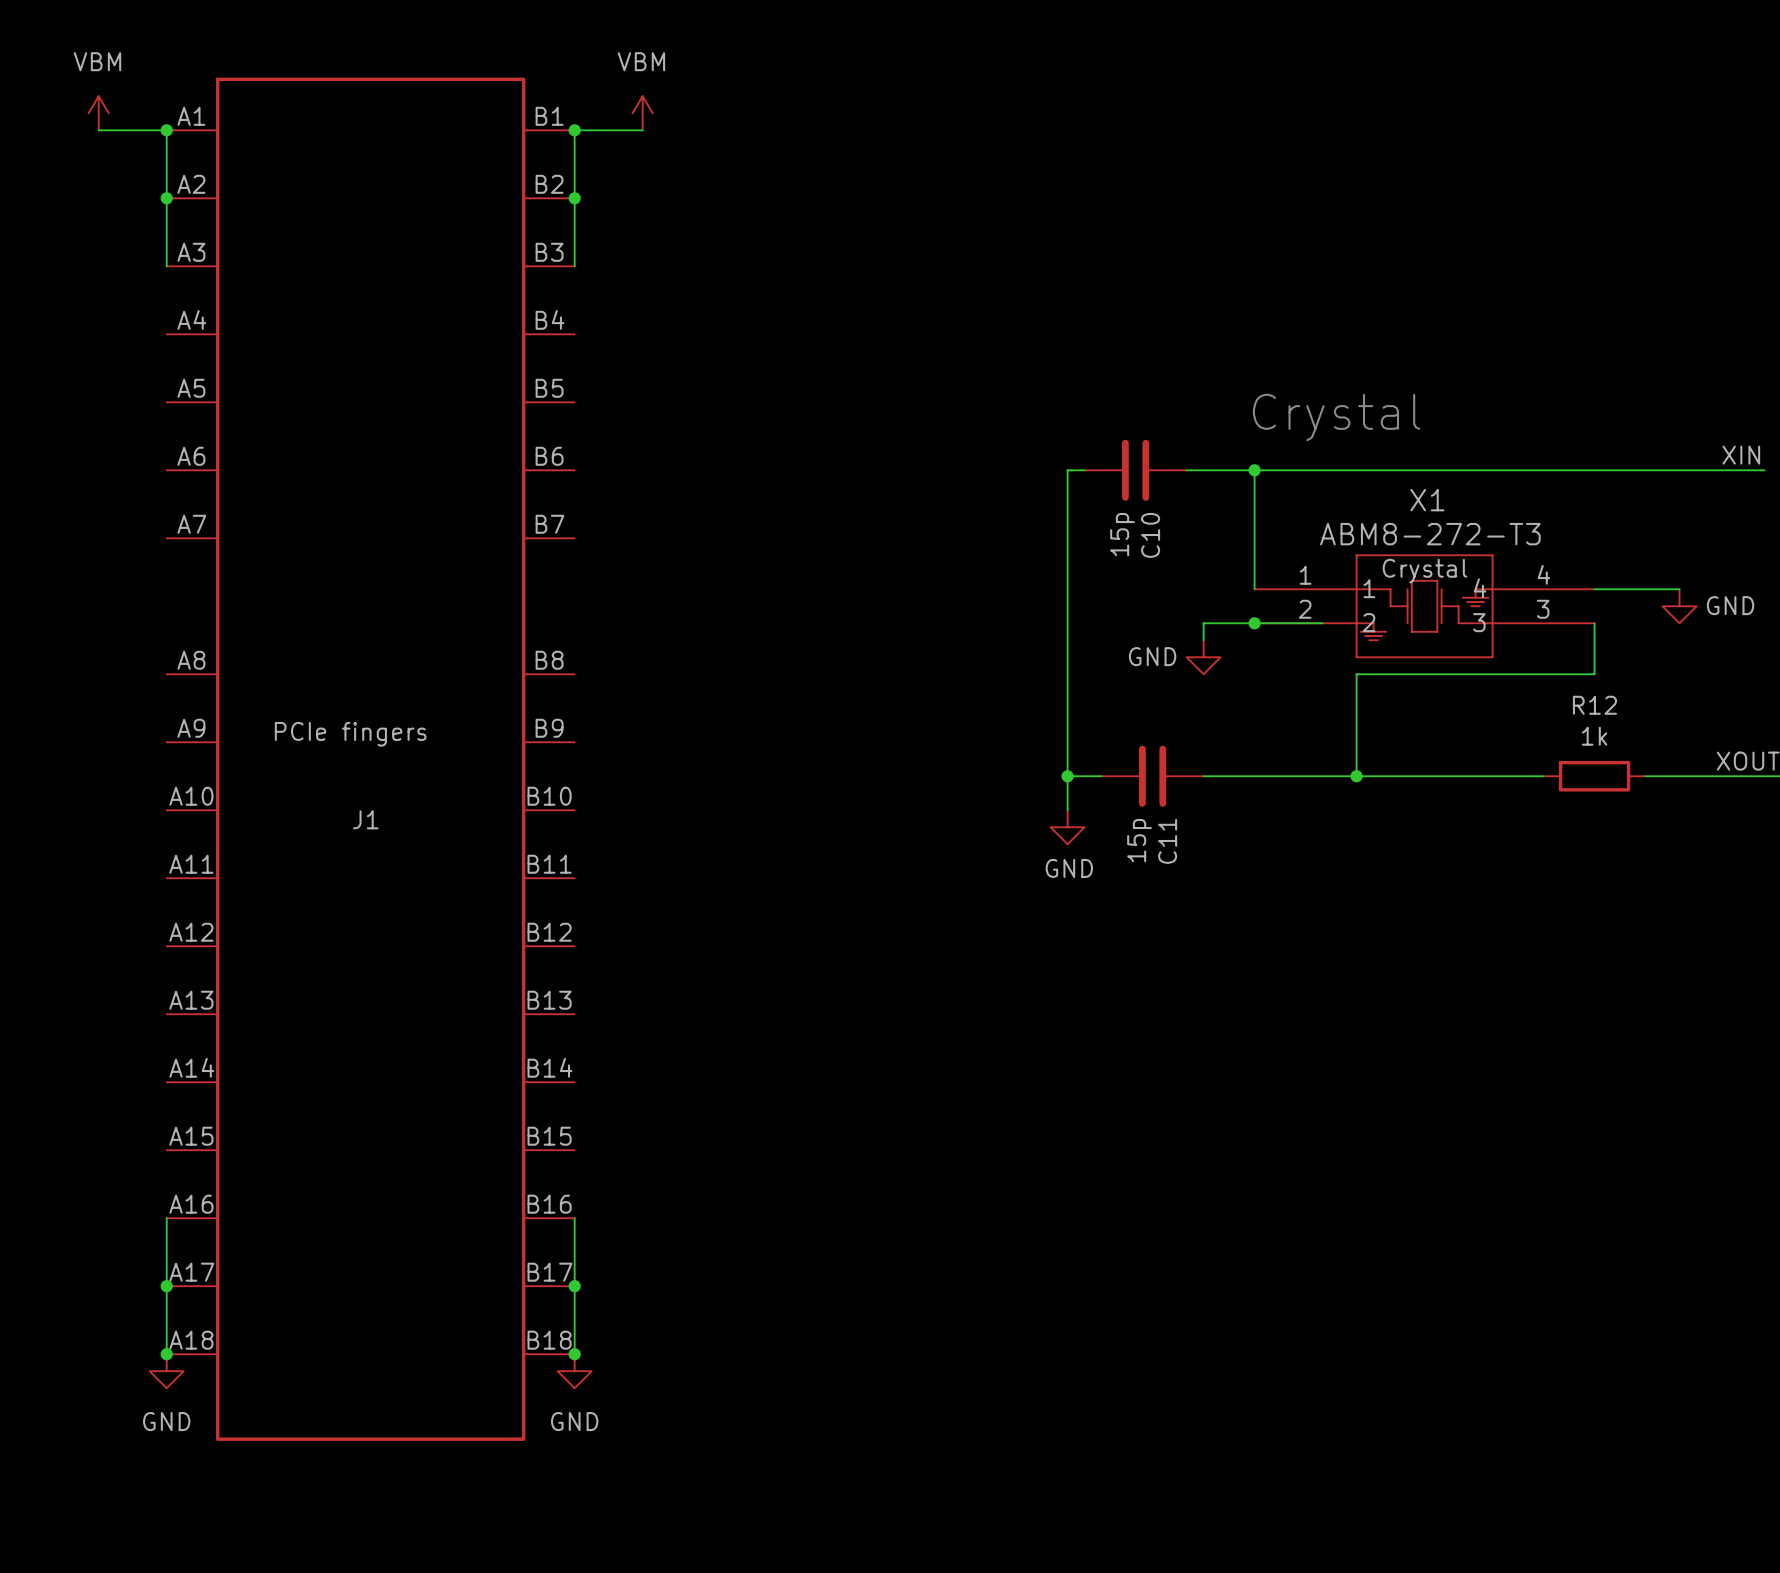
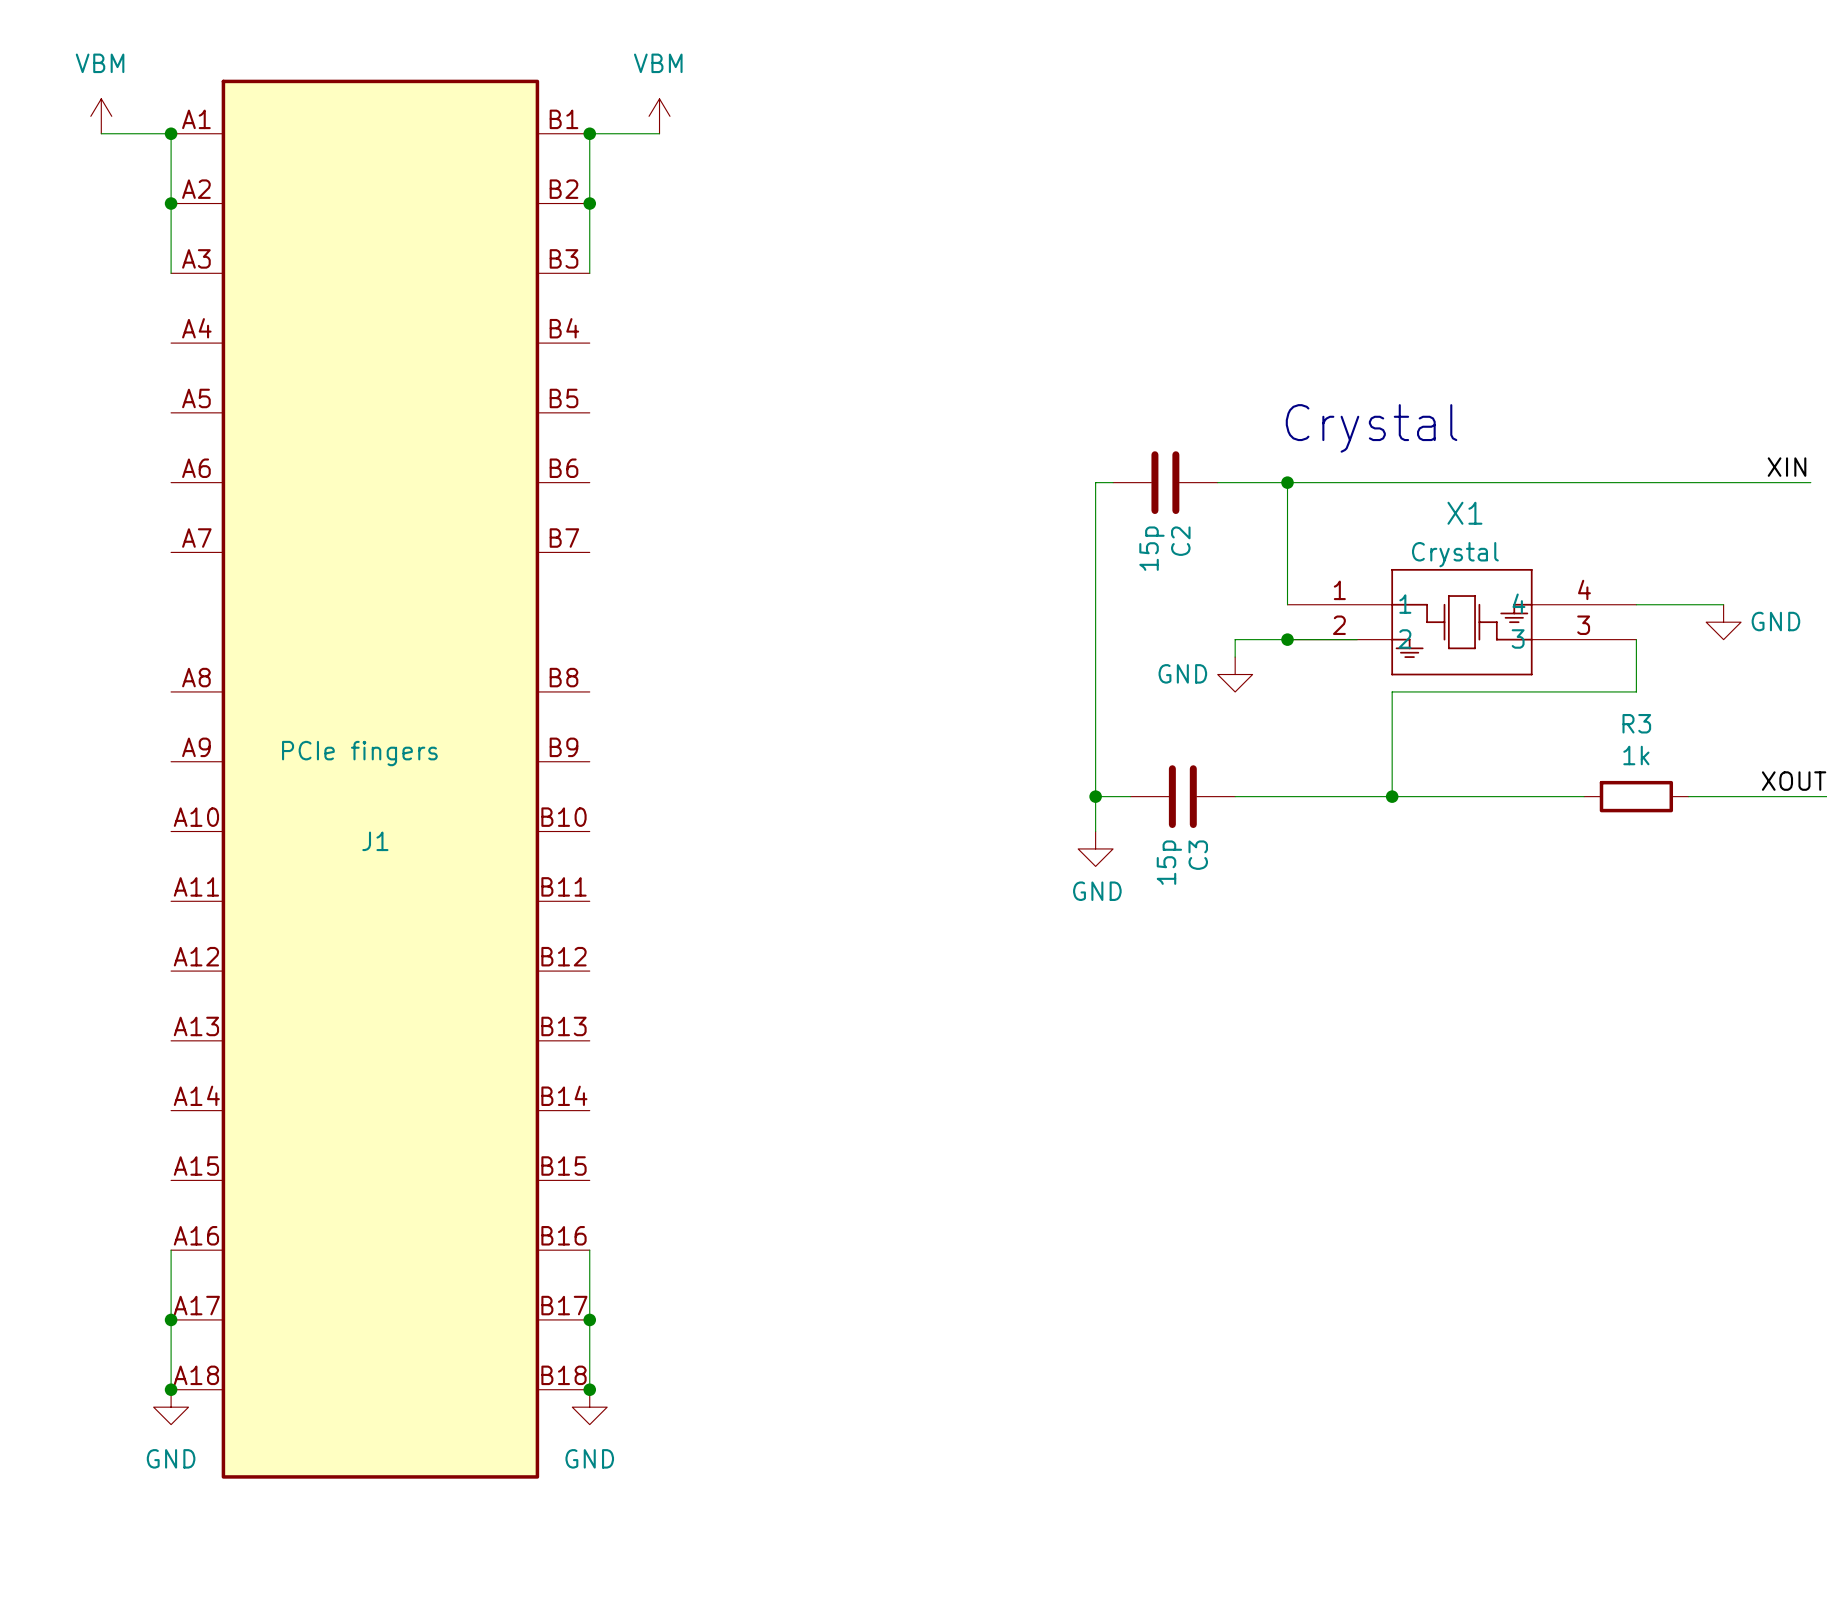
X1 value: ABM8-272-T3 (1430, 534) -> none
C10 name: C10 (1150, 535) -> C2 (1180, 541)
X1 text position: Crystal (1424, 571) -> Crystal (1455, 554)
R12 name: R12 (1594, 705) -> R3 (1636, 723)
C11 name: C11 (1167, 841) -> C3 (1198, 855)

